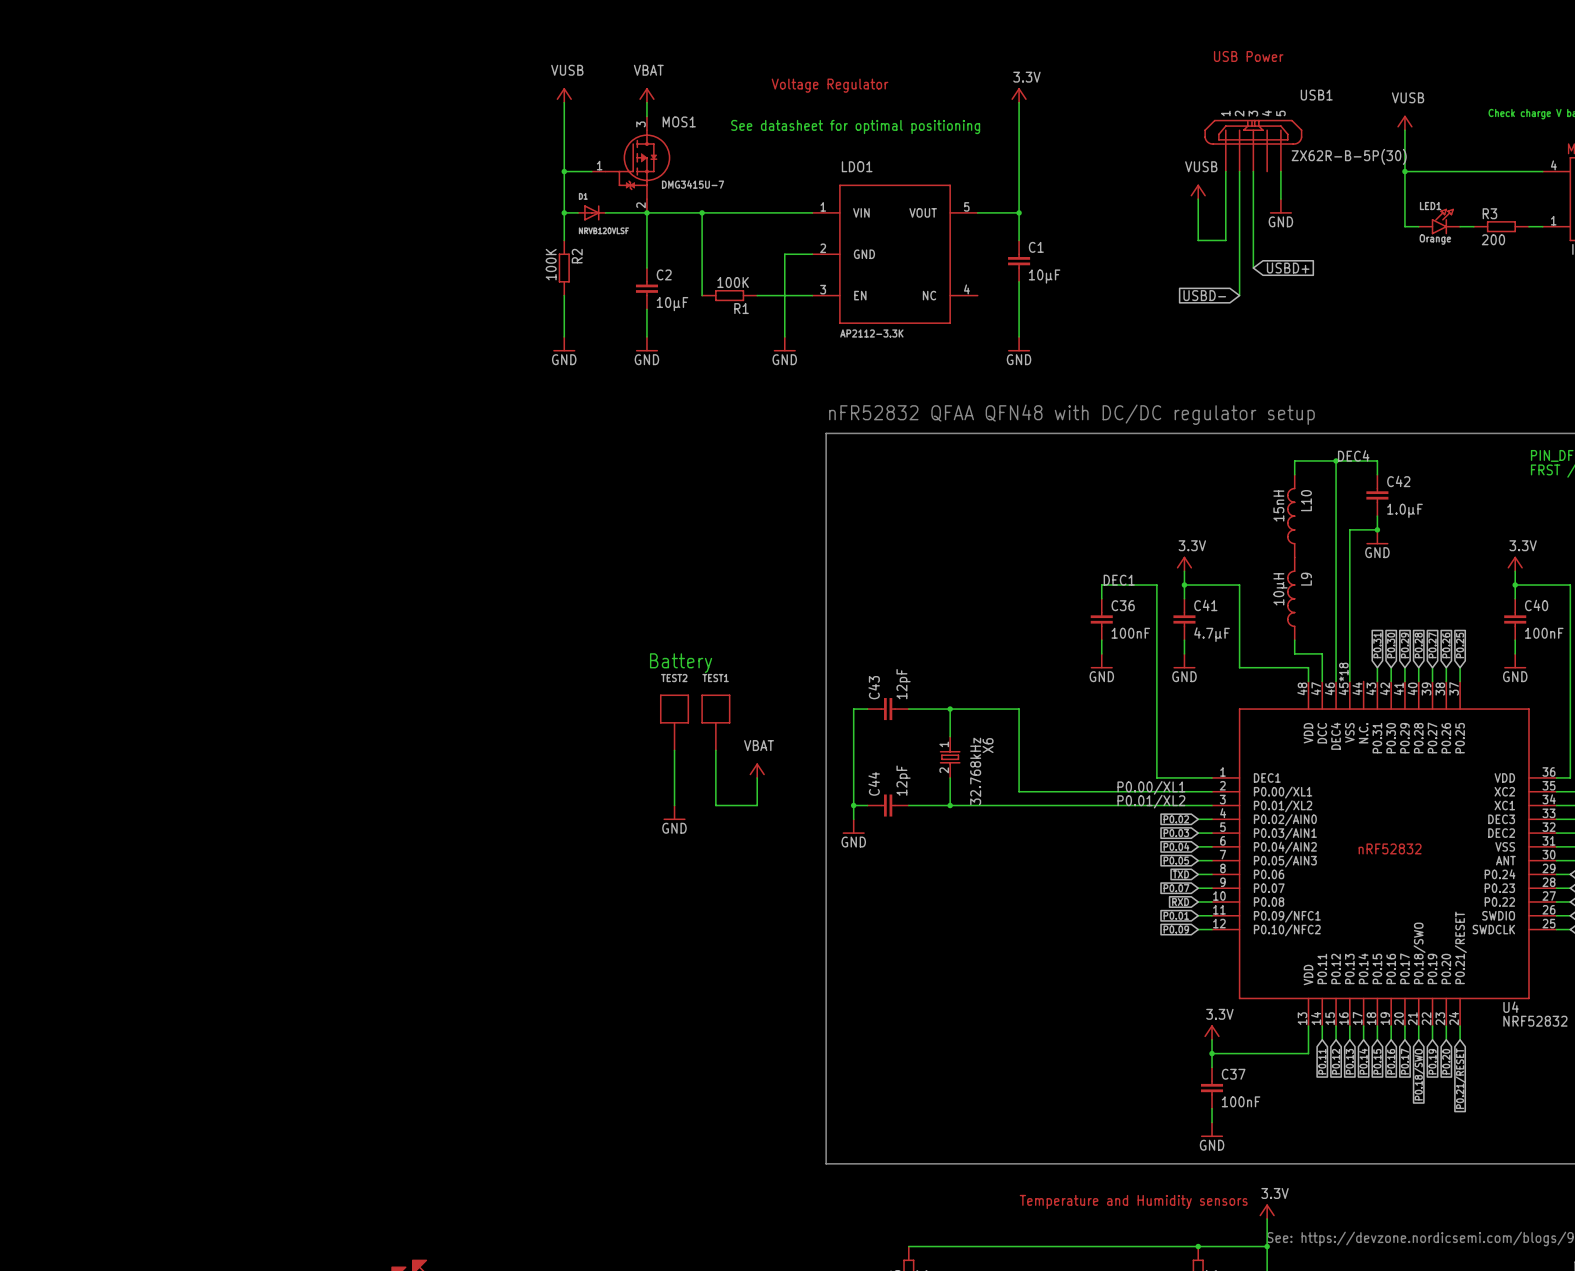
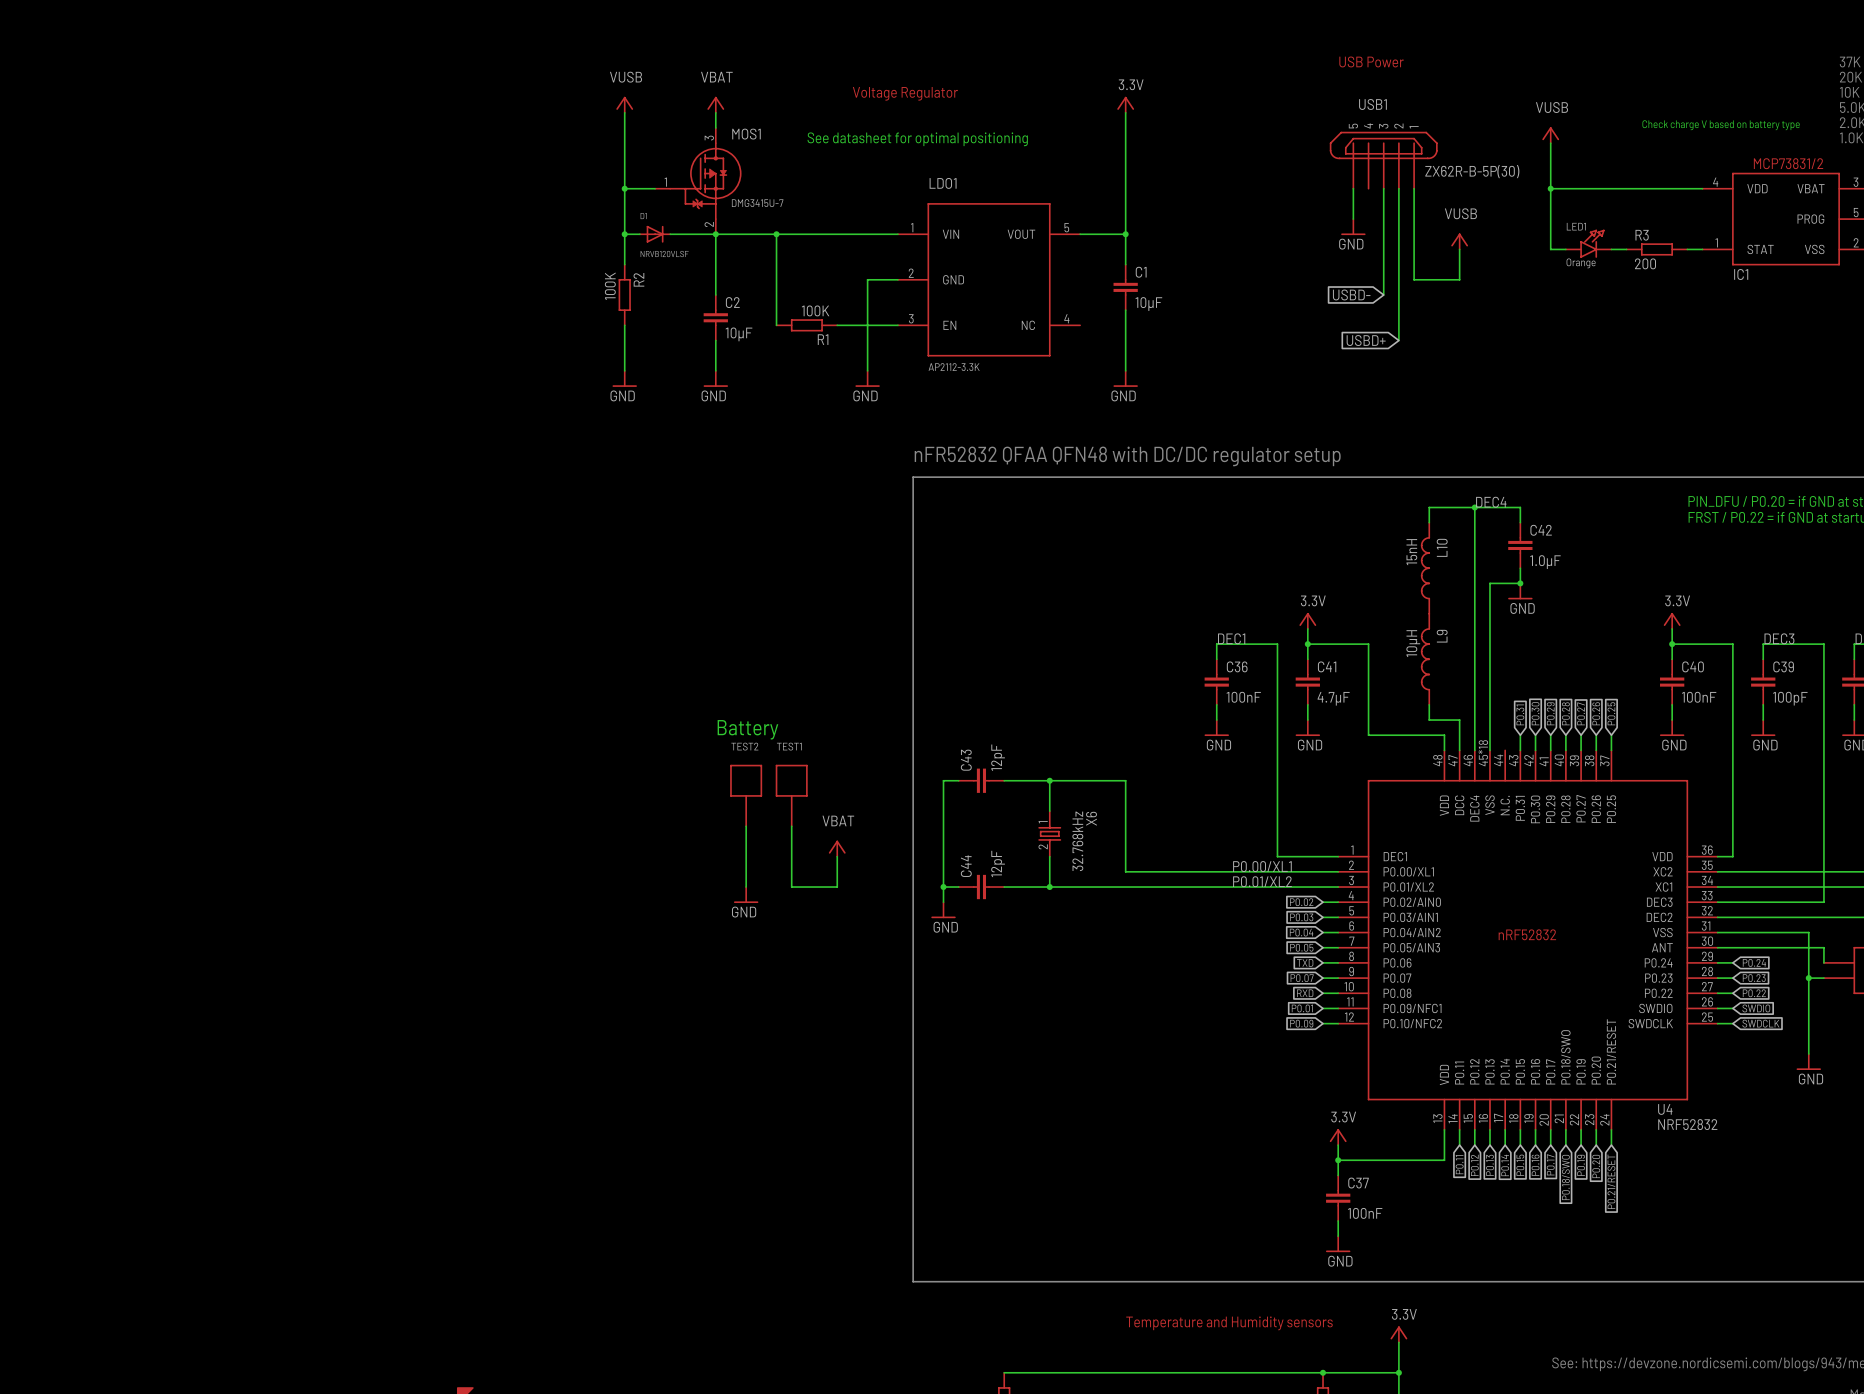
USB1 name position: USB1 (1316, 95) -> USB1 (1372, 104)
USB1 symbol: [1204, 119, 1303, 172] -> [1329, 131, 1438, 189]
wire: (1239, 171) (1239, 295) -> none
wire: none -> (1398, 188) (1398, 340)
power symbol position: VUSB (1198, 191) -> VUSB (1459, 241)
wire: (1198, 199) (1198, 240) (1225, 240) (1225, 199) -> none
wire: none -> (1414, 219) (1414, 279) (1459, 279) (1459, 249)
power symbol position: GND (1280, 206) -> GND (1353, 227)
global label: USBD+ (1288, 268) -> USBD- (1351, 294)
global label: USBD- (1204, 295) -> USBD+ (1366, 340)

